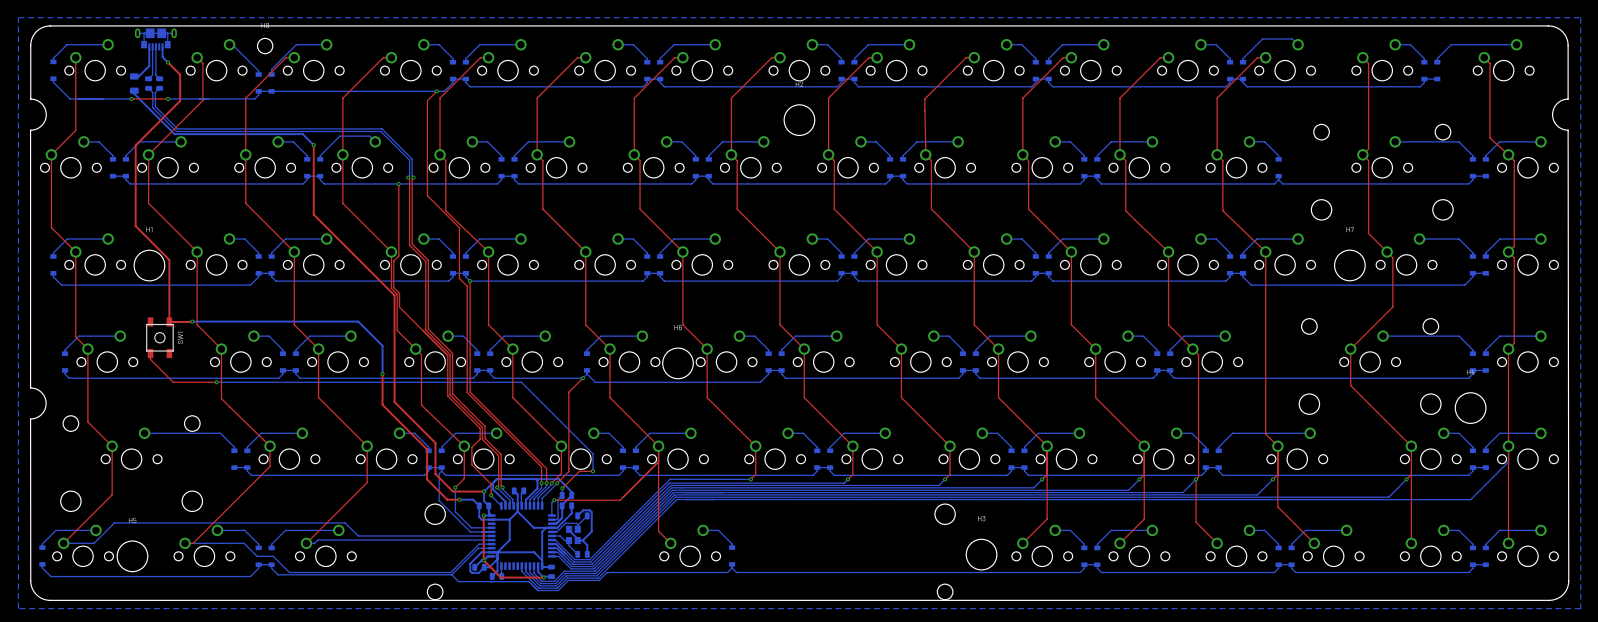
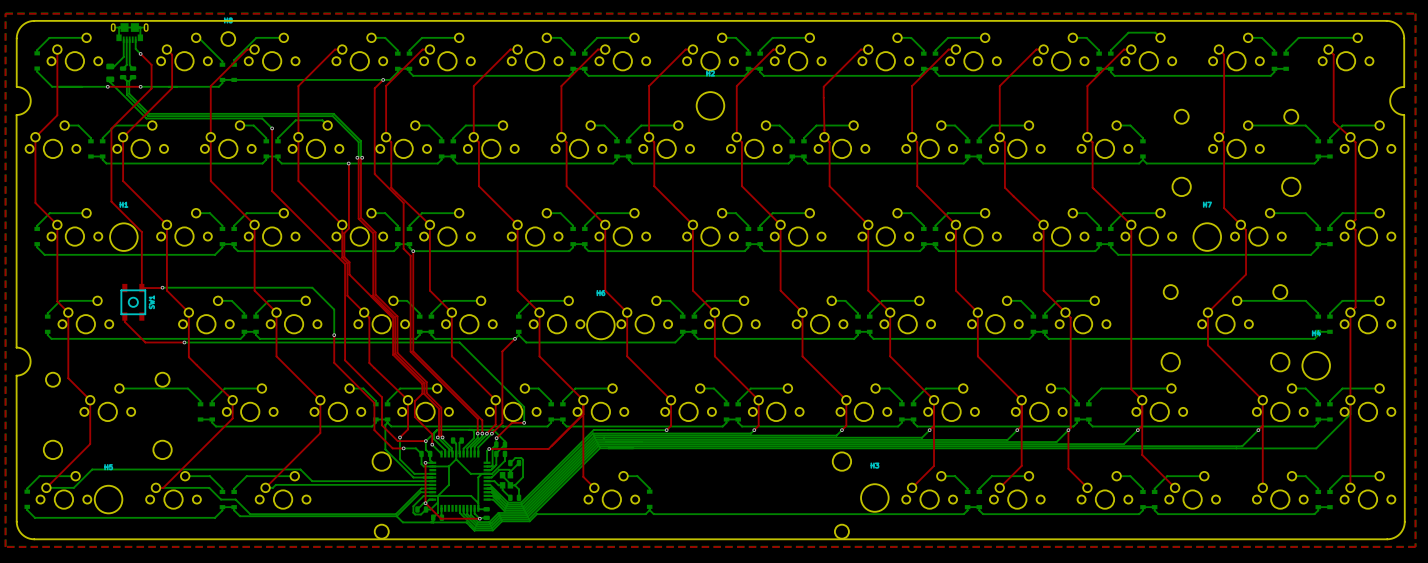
top zone outline: none -> (5, 13) (5, 547) (1415, 547) (1415, 13) (5, 13)

